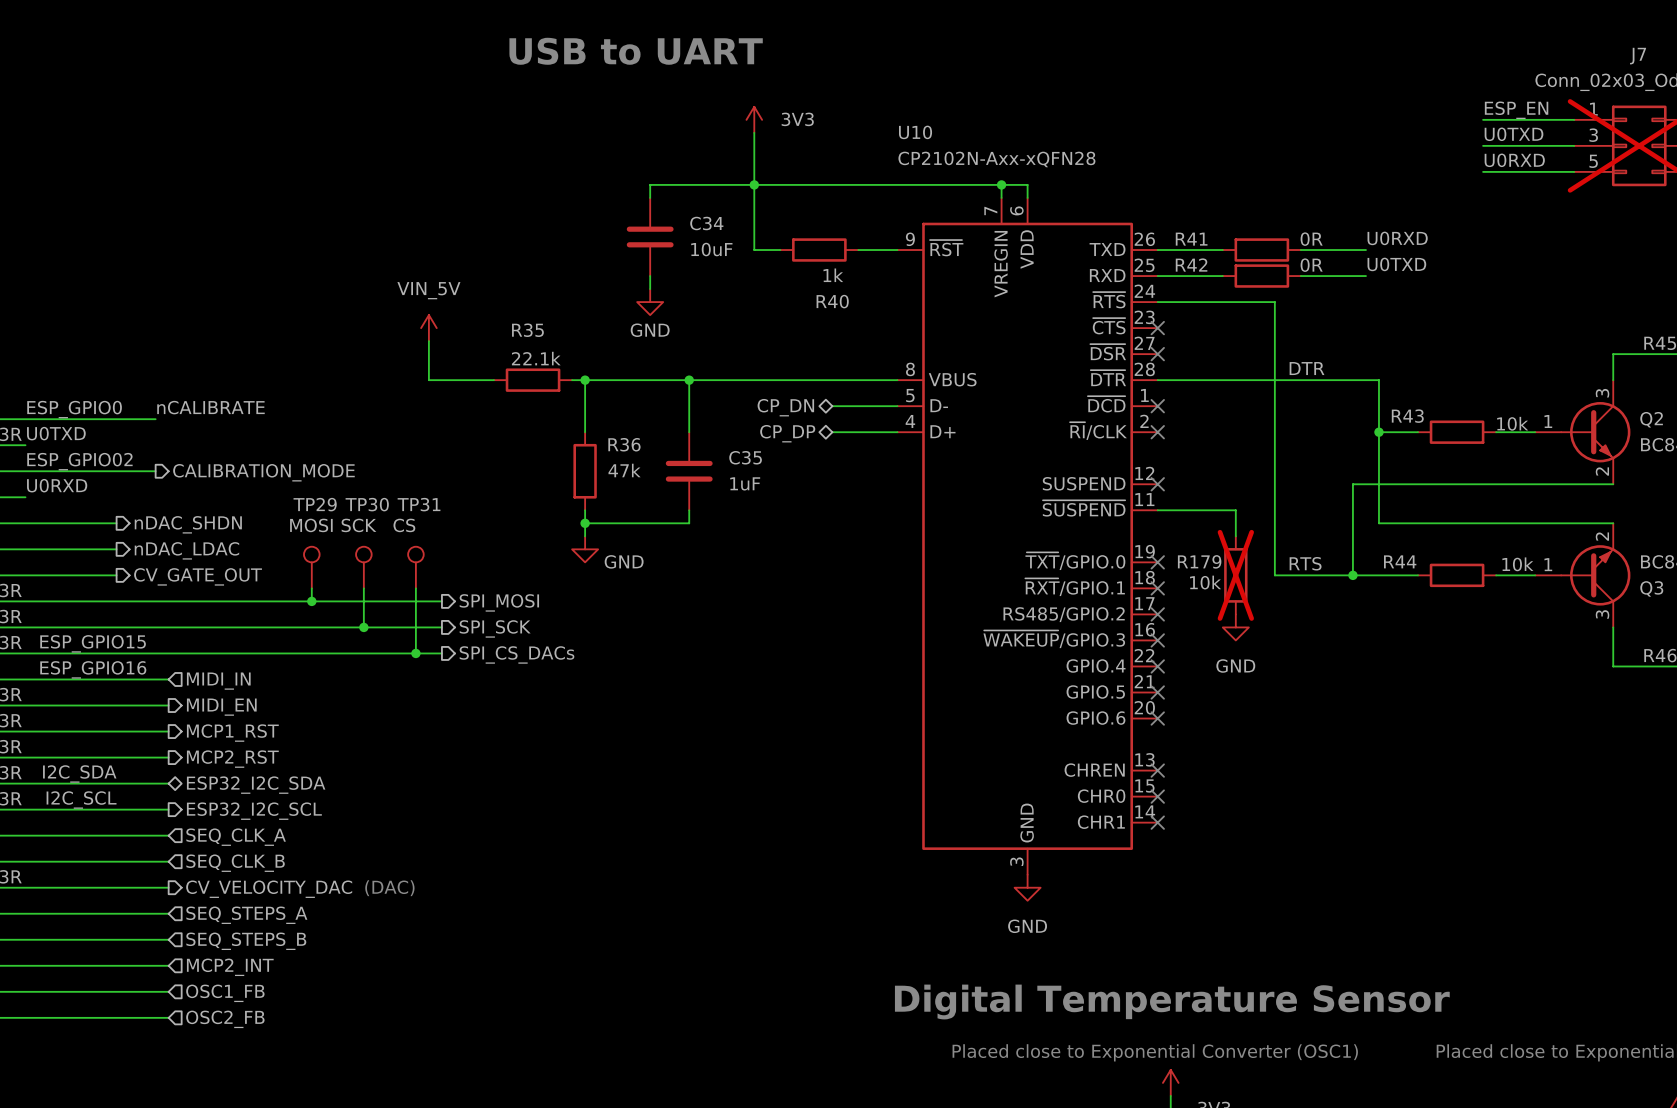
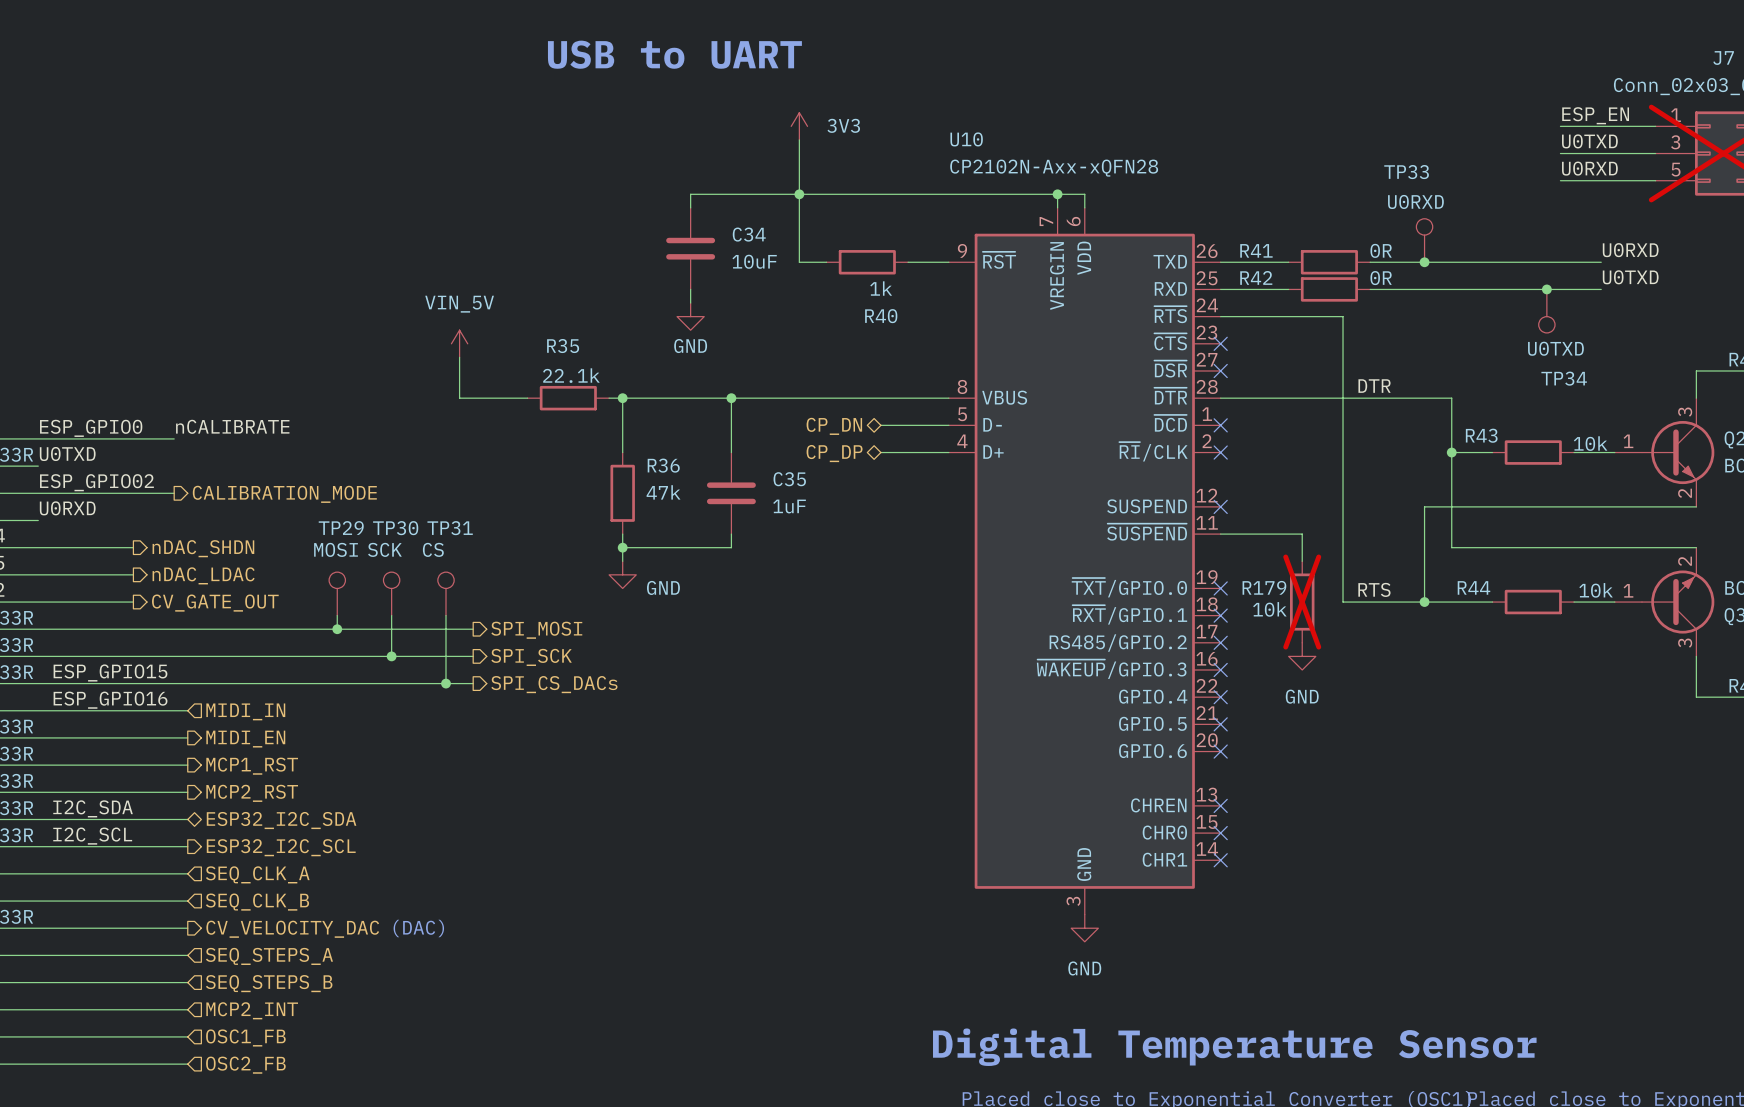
TP33: none -> U0RXD (1424, 240)
label position: U0RXD (1397, 238) -> U0RXD (1630, 250)
junction: none -> (1424, 262)
wire: none -> (1438, 262) (1601, 262)
label position: U0TXD (1396, 264) -> U0TXD (1630, 277)
wire: none -> (1438, 289) (1601, 289)
junction: none -> (1546, 289)
TP34: none -> U0TXD (1546, 311)

